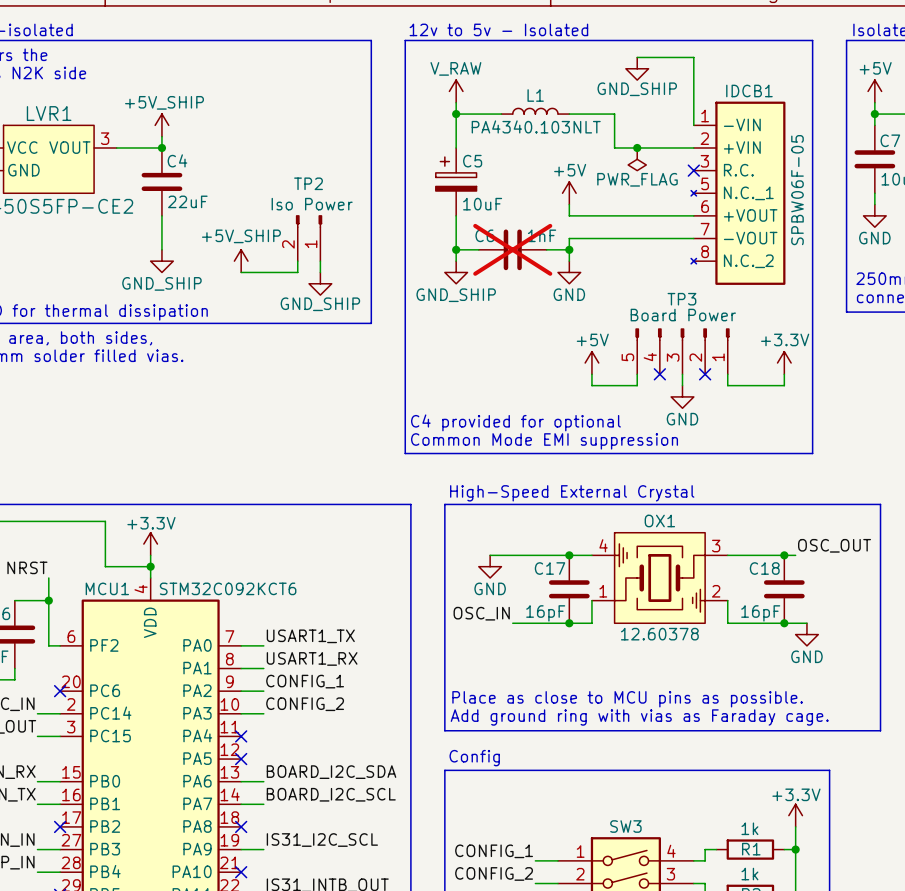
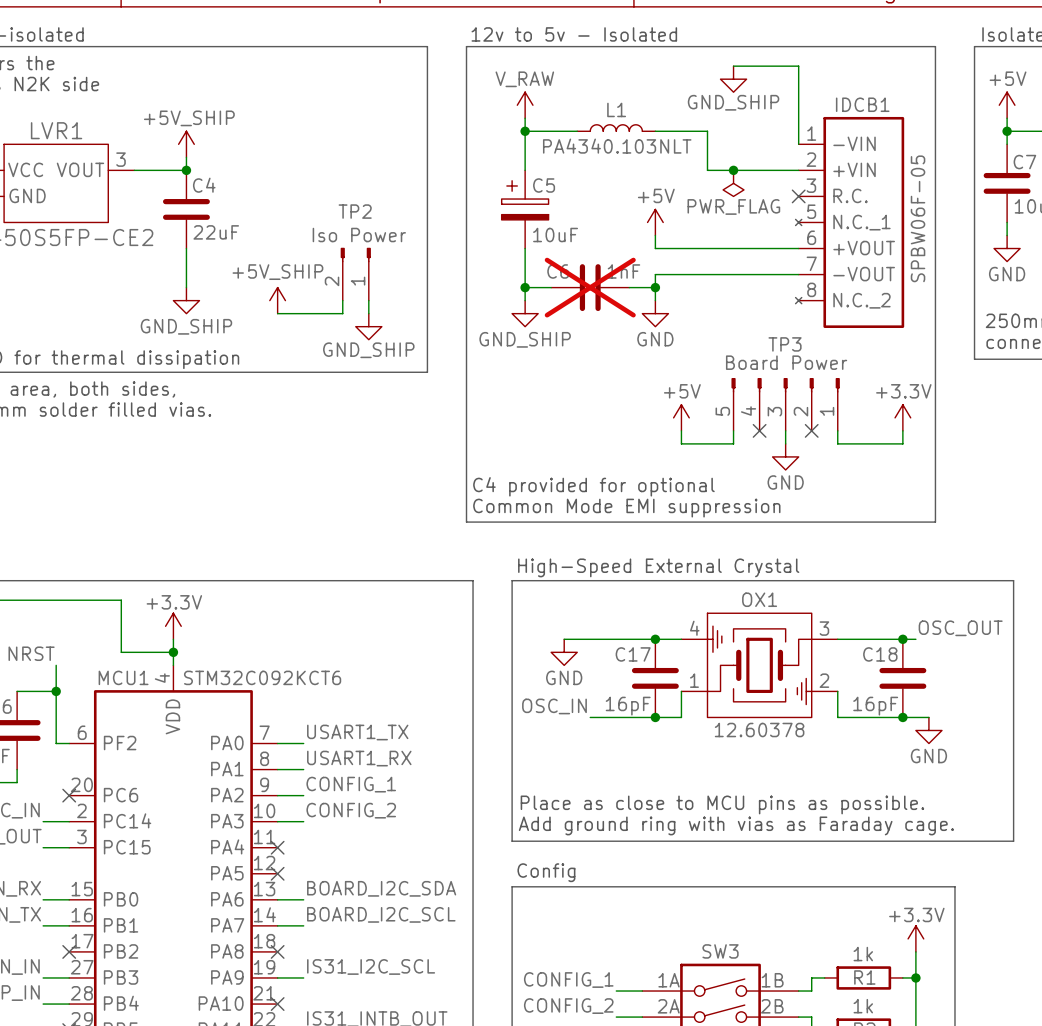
SW3 pin number: 1 (580, 851) -> 1A (669, 980)
SW3 pin number: 4 (671, 851) -> 1B (772, 980)
SW3 pin number: 2 (580, 874) -> 2A (668, 1006)
SW3 pin number: 3 (670, 874) -> 2B (772, 1006)

